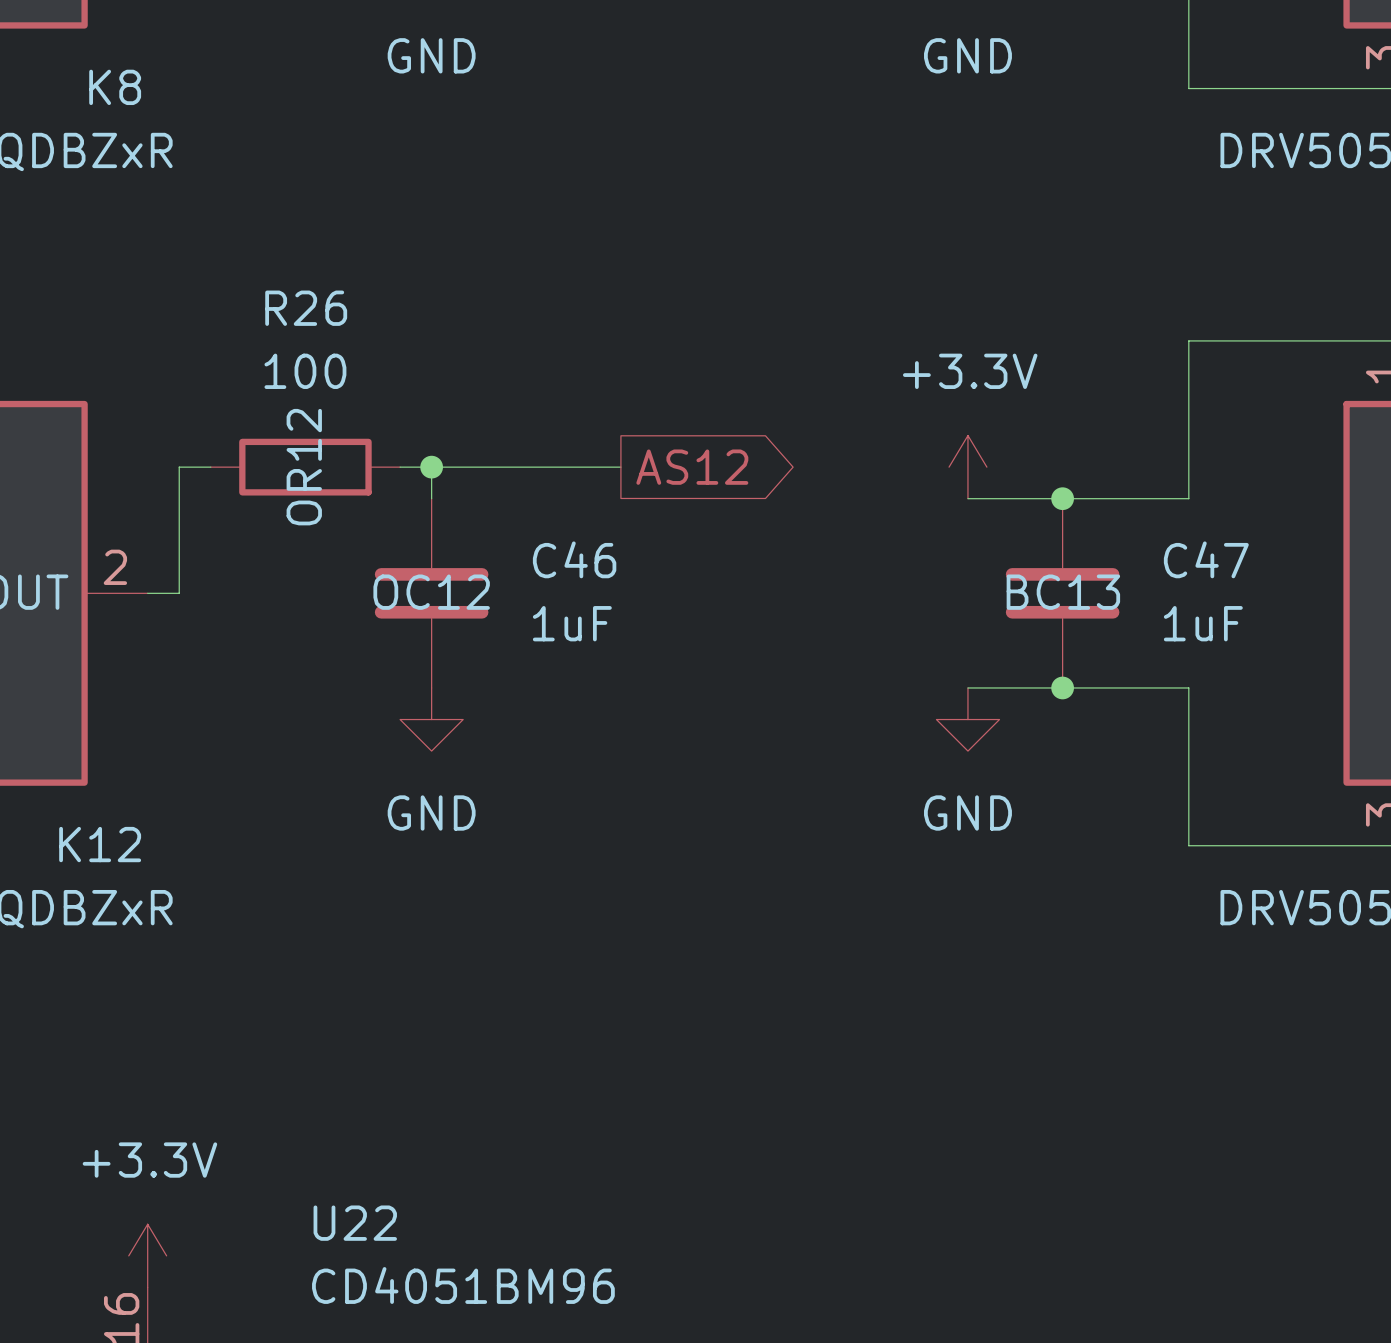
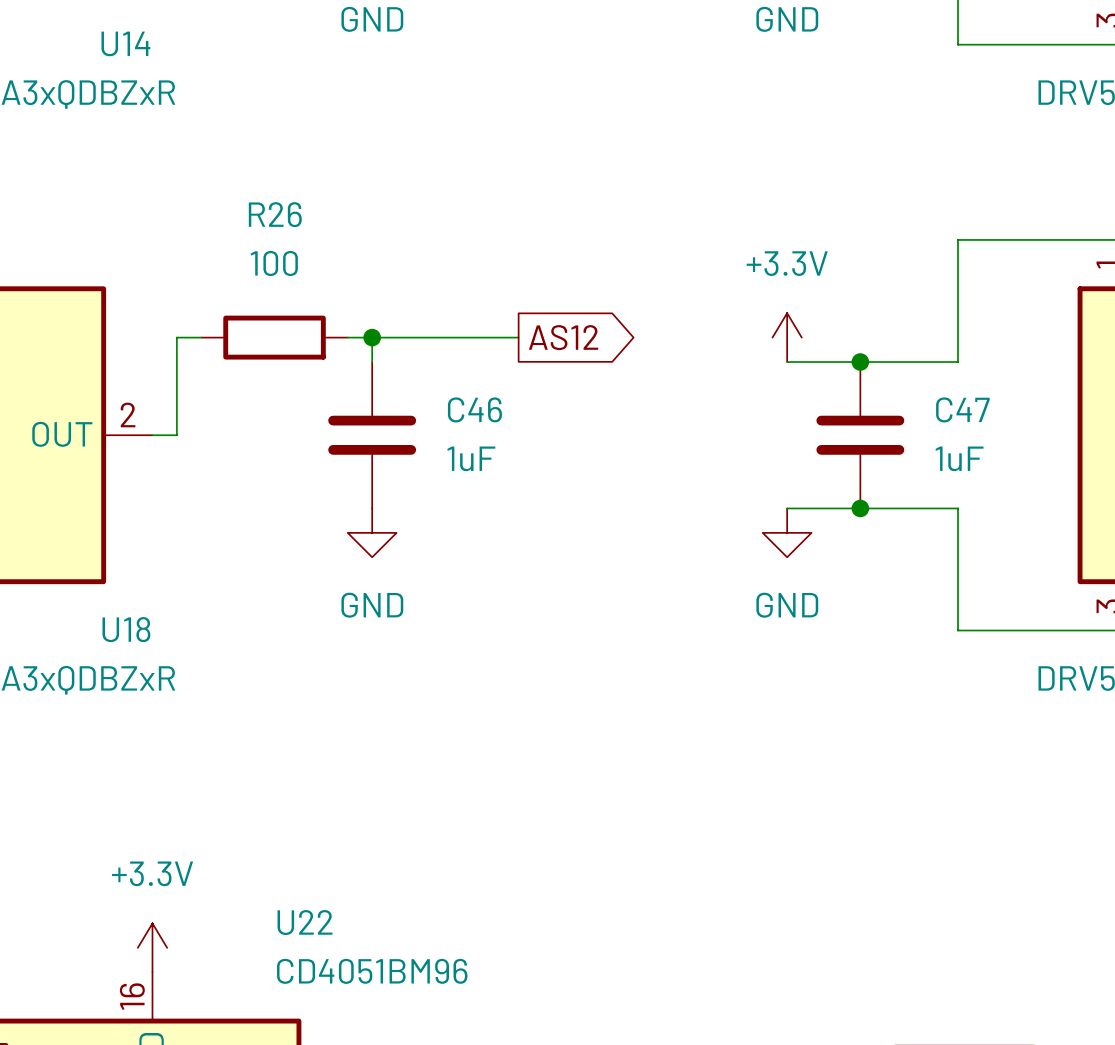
K8 name: K8 (115, 87) -> U14 (125, 43)
R26 text: OR12 (304, 467) -> none
C46 text: OC12 (431, 592) -> none
C47 text: BC13 (1063, 592) -> none
K12 name: K12 (100, 844) -> U18 (126, 629)

